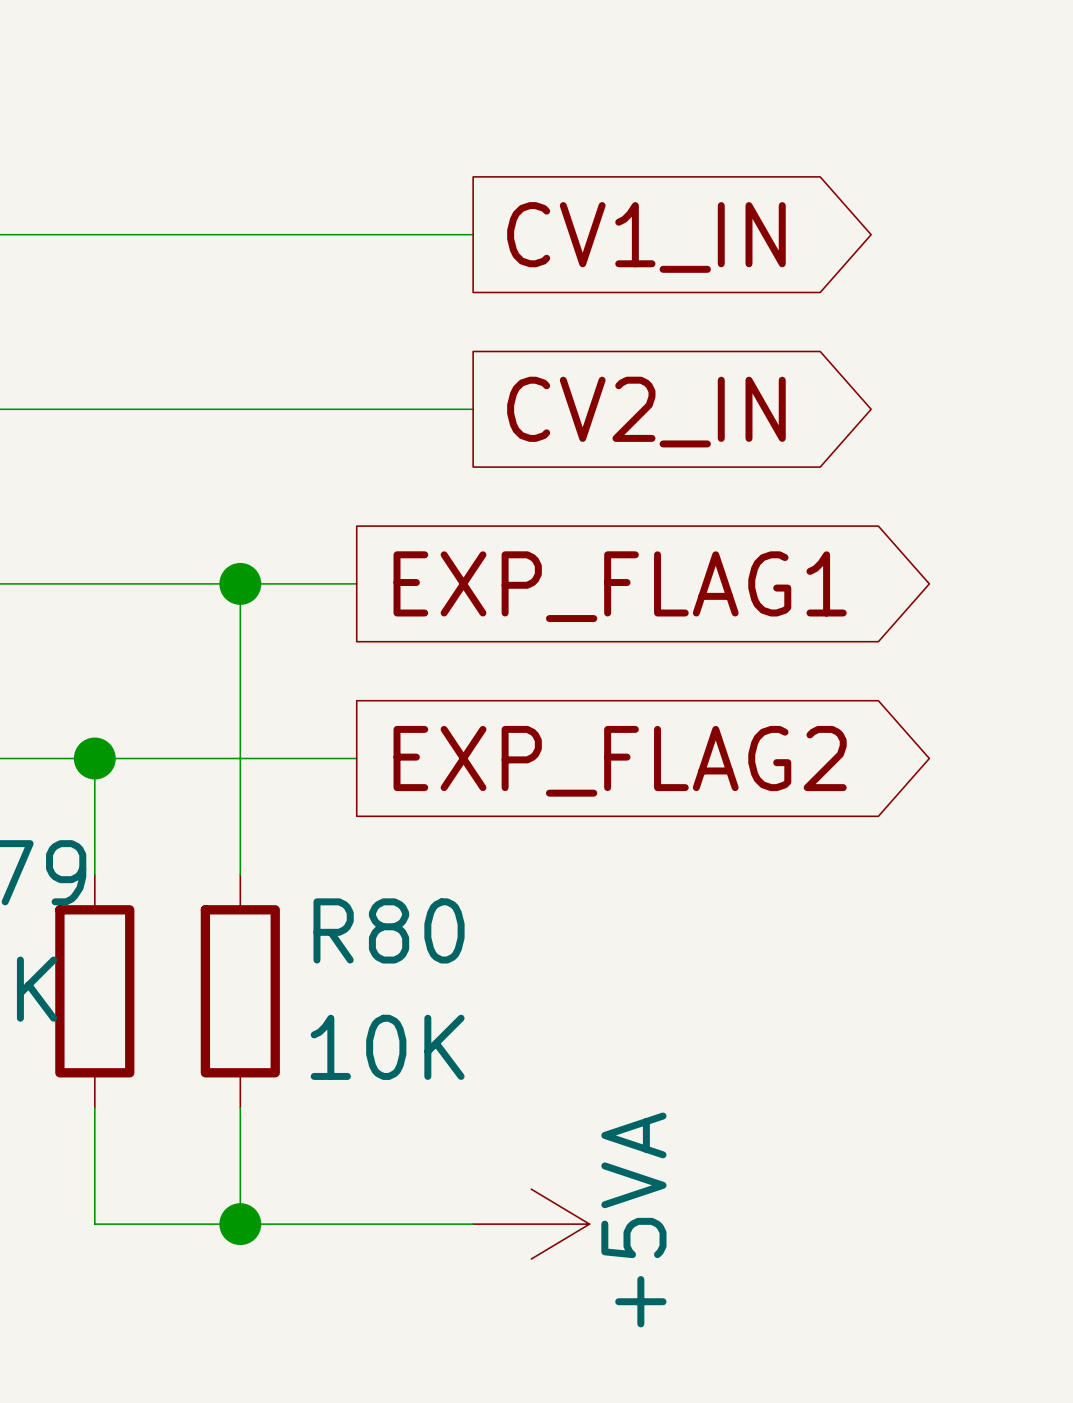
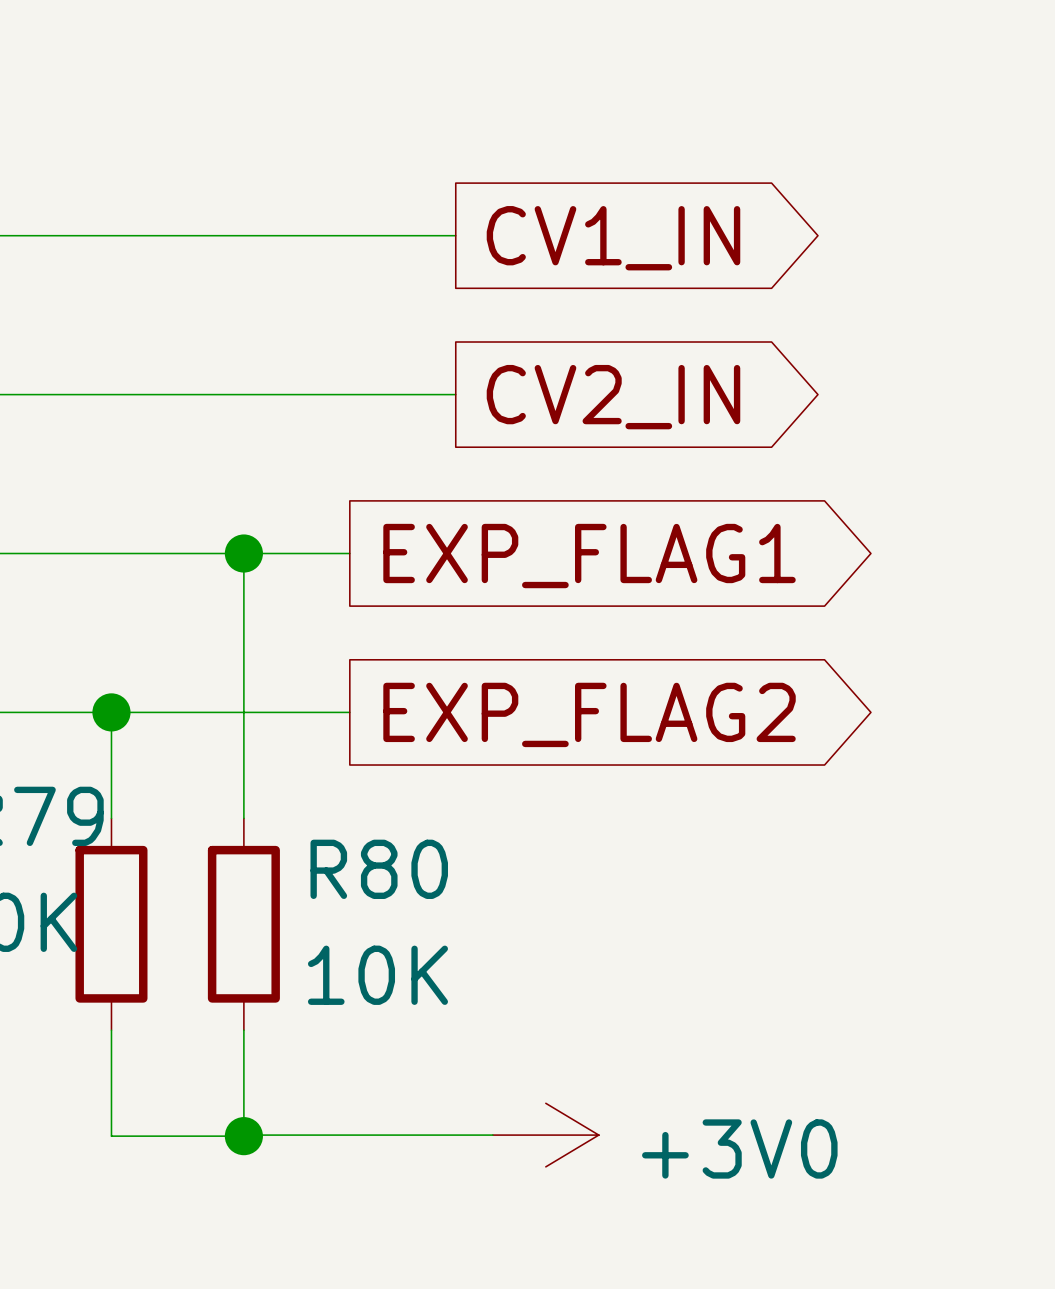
wire: (240, 1224) (473, 1224) -> (243, 1135) (492, 1135)
power symbol: +5VA (531, 1224) -> +3V0 (545, 1135)

